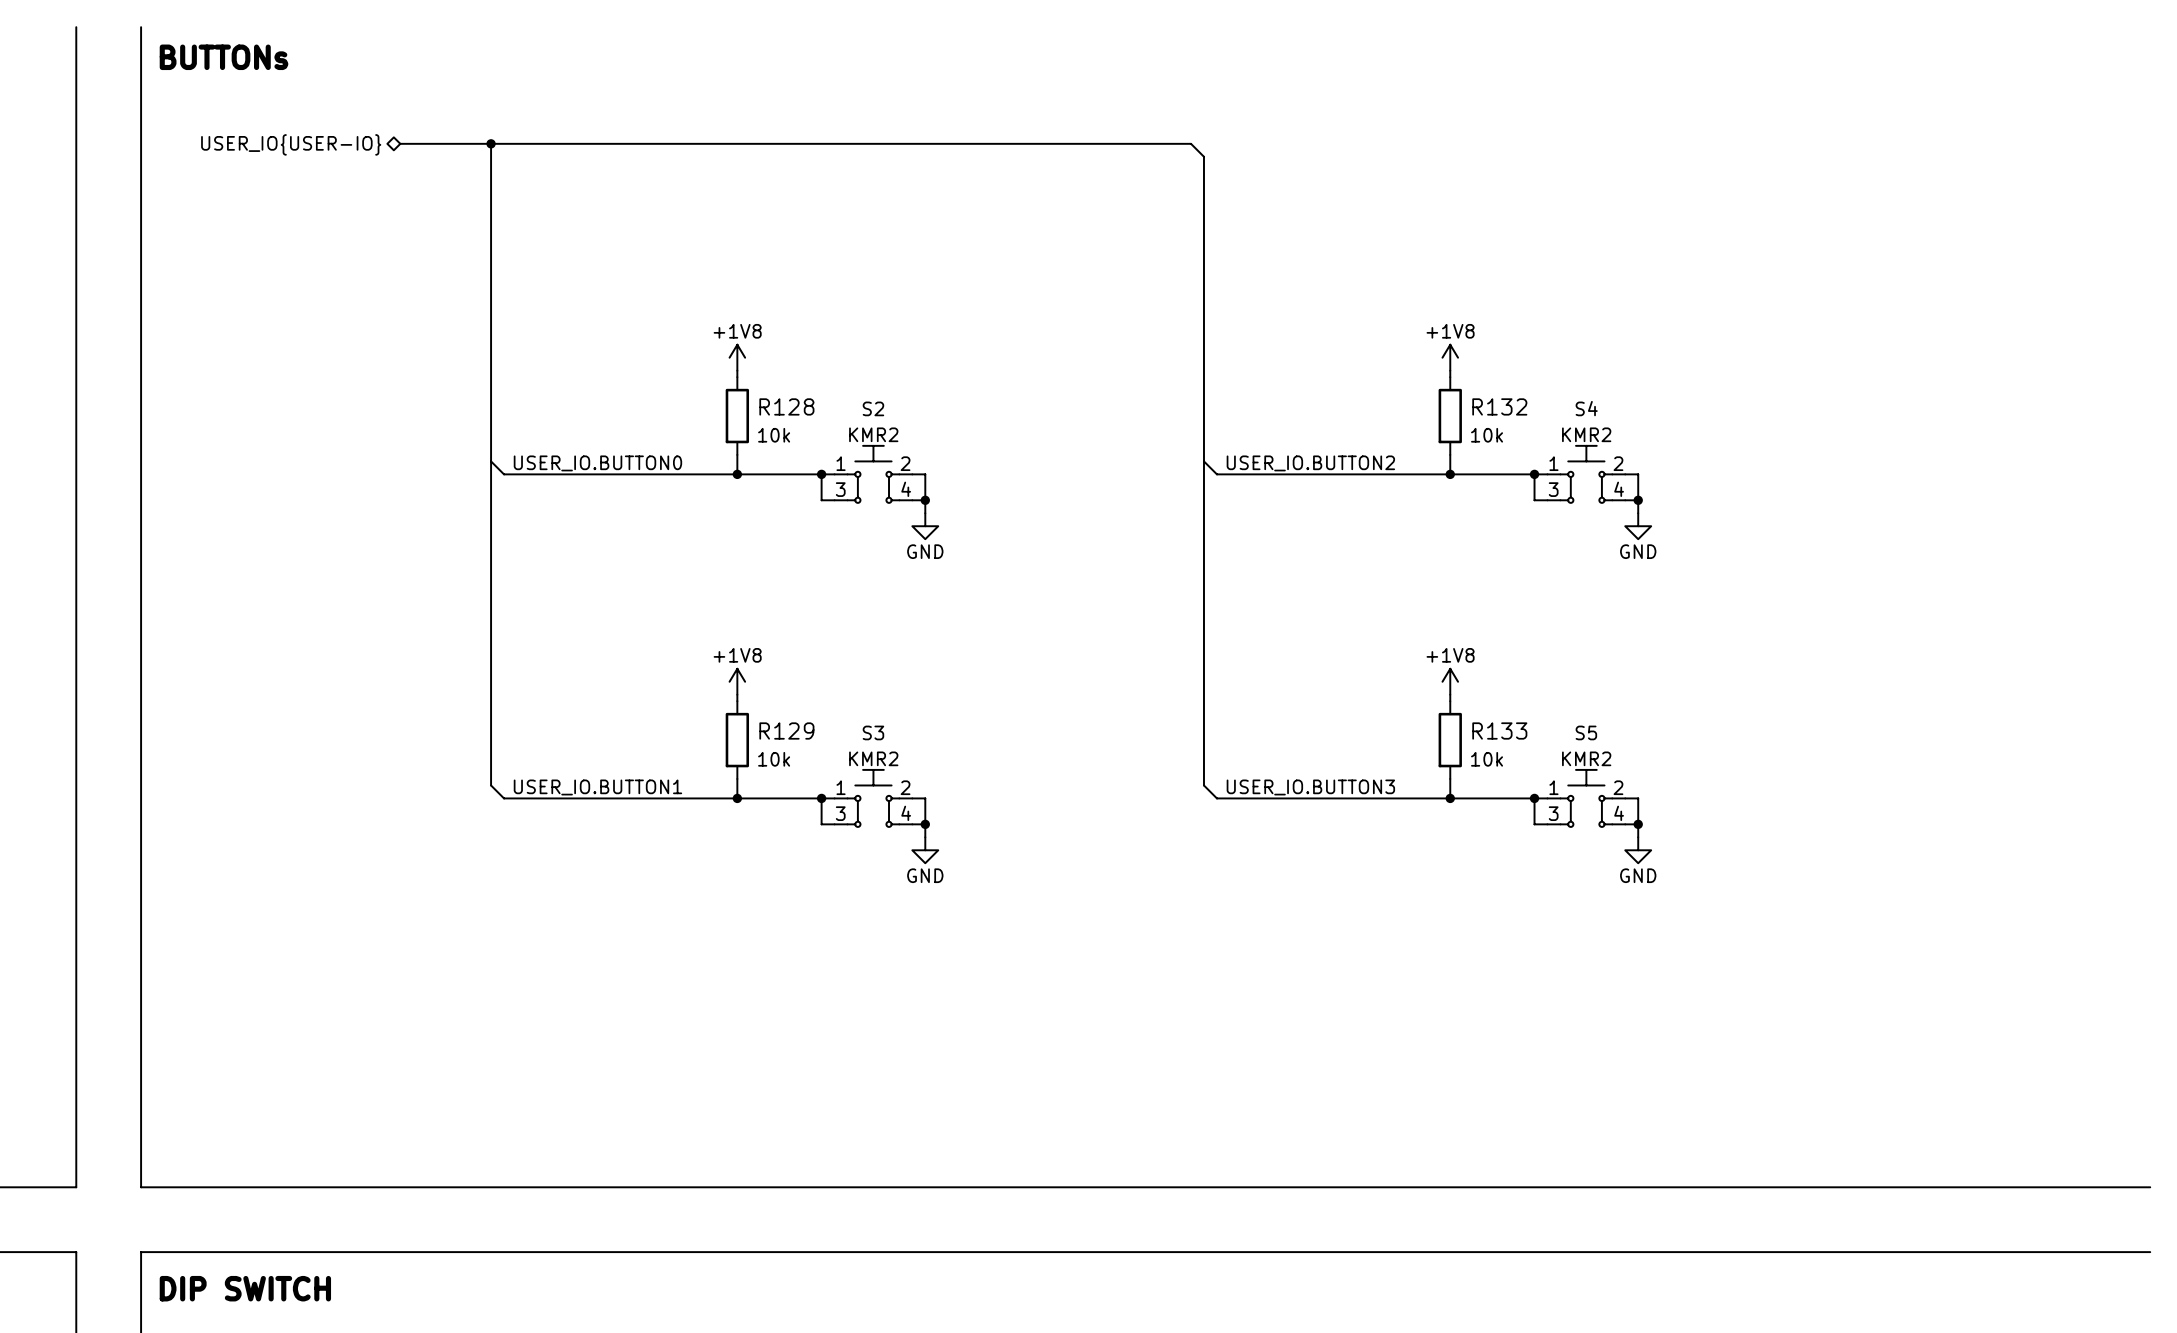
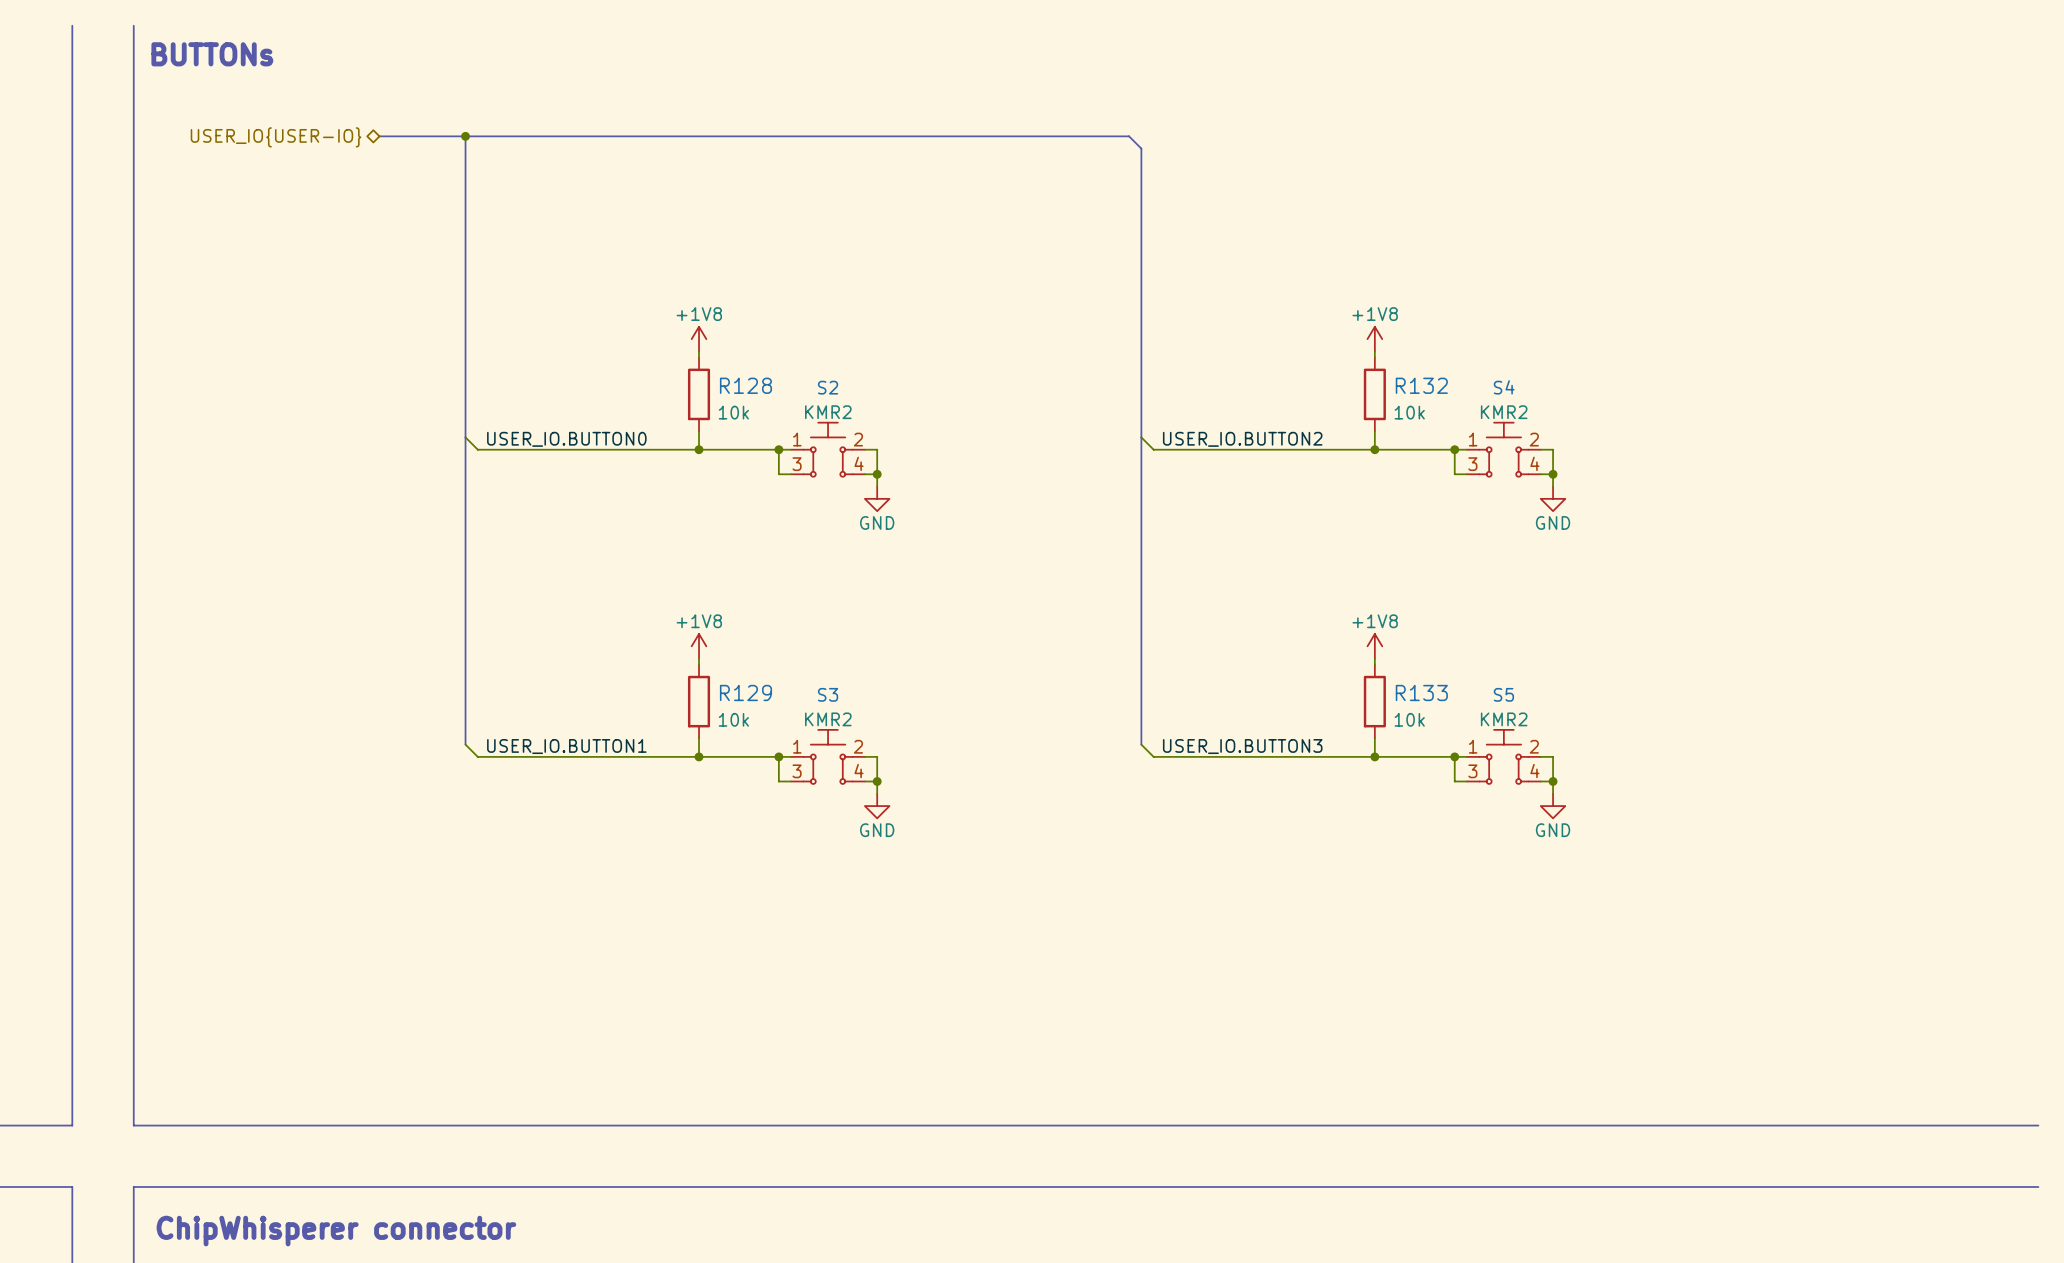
text: DIP SWITCH (245, 1288) -> ChipWhisperer connector (336, 1231)

